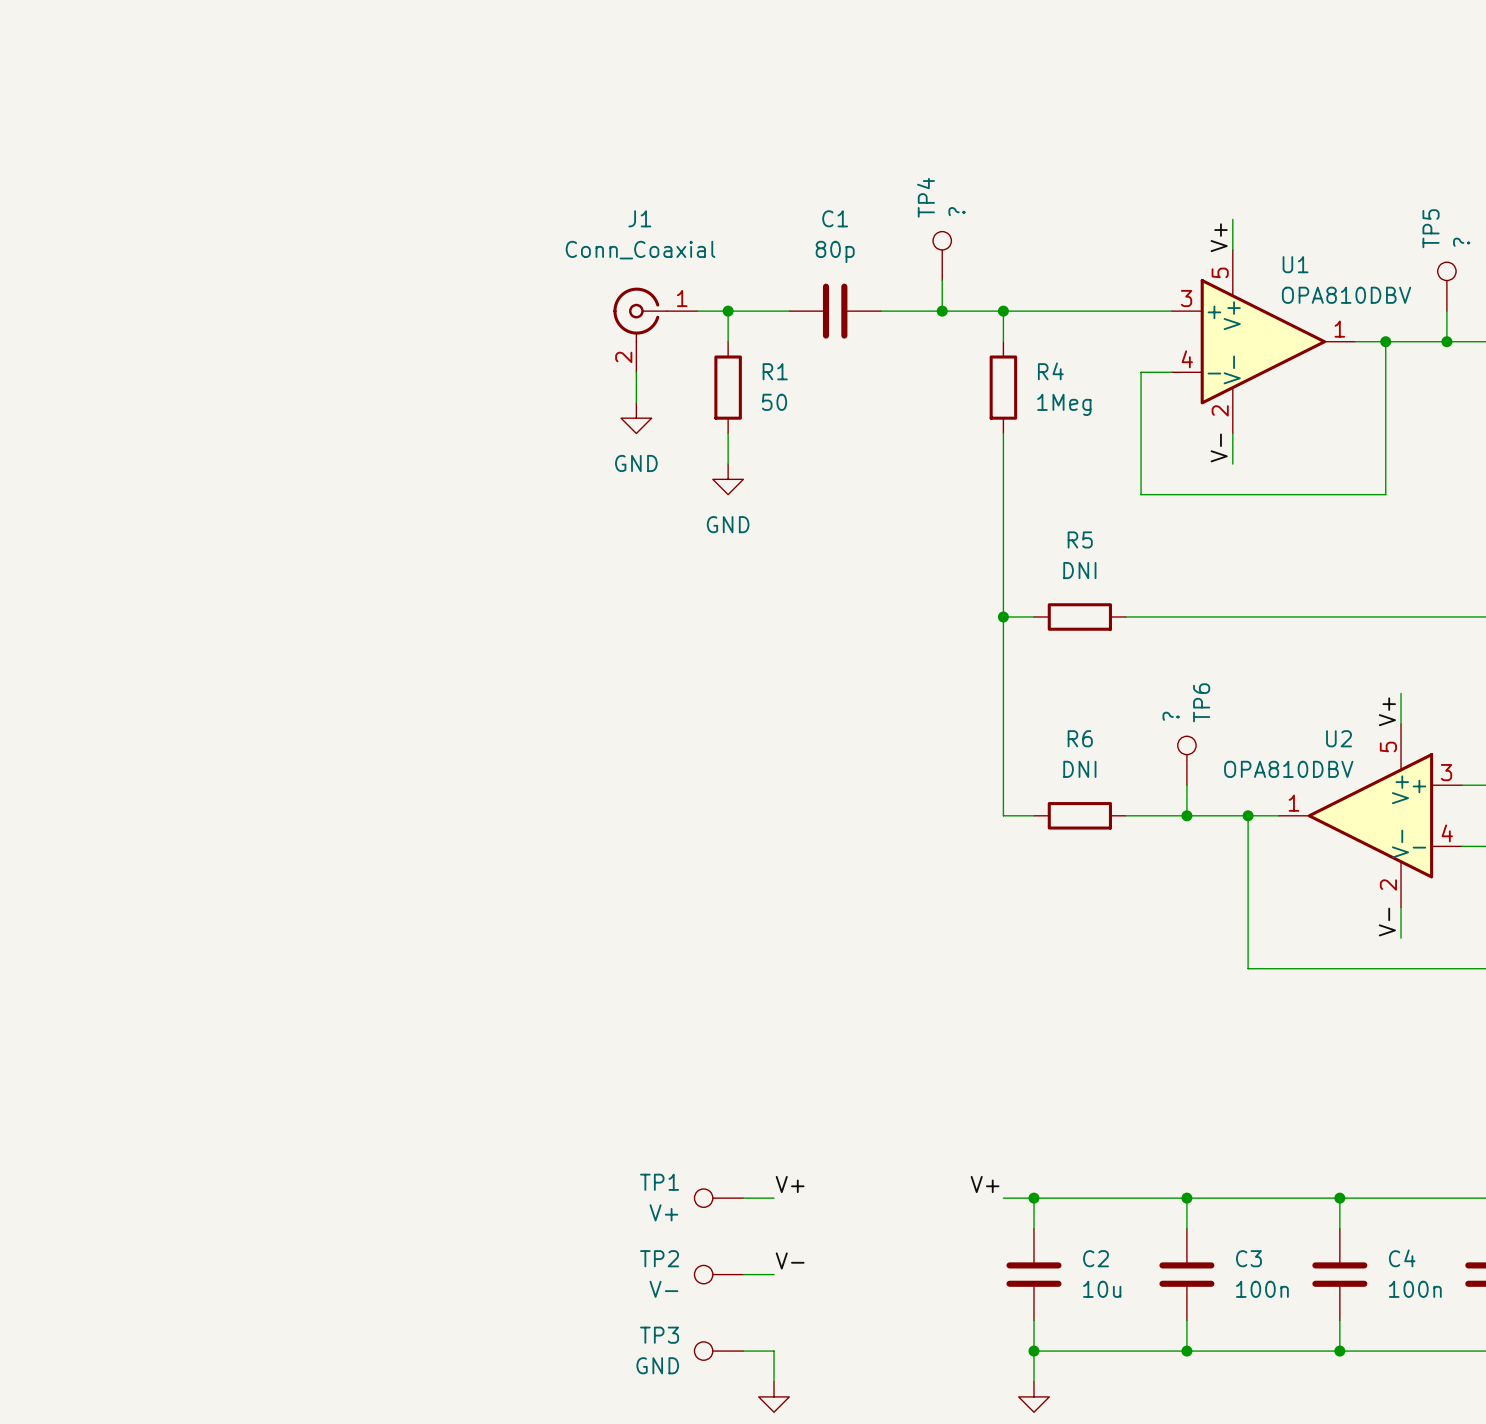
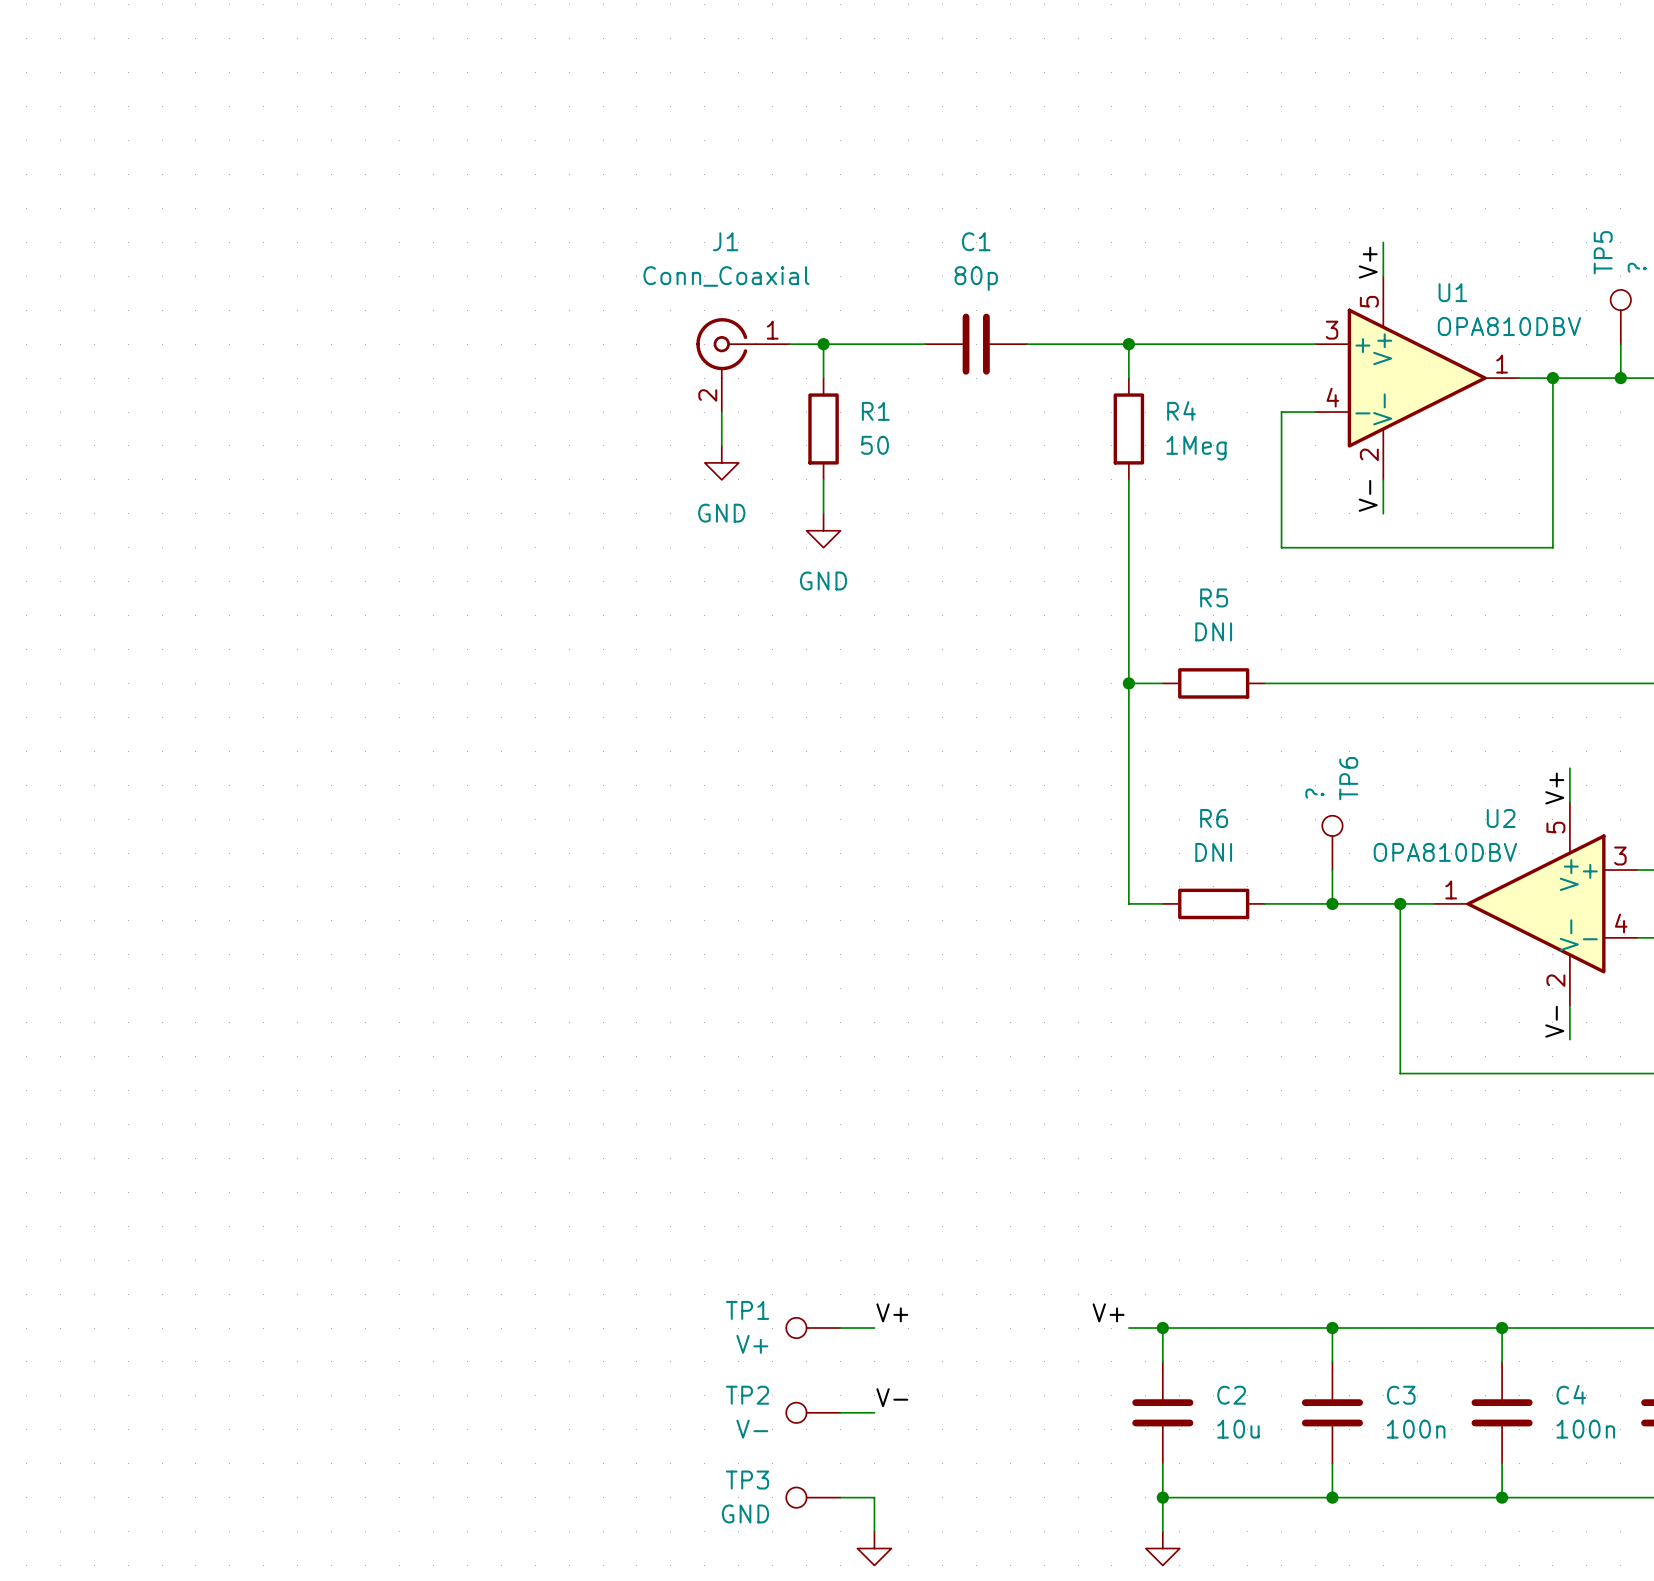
TP4: ? (942, 256) -> none
wire: (942, 280) (942, 311) -> none
C1 position: (835, 311) -> (976, 344)
junction: (942, 311) -> none

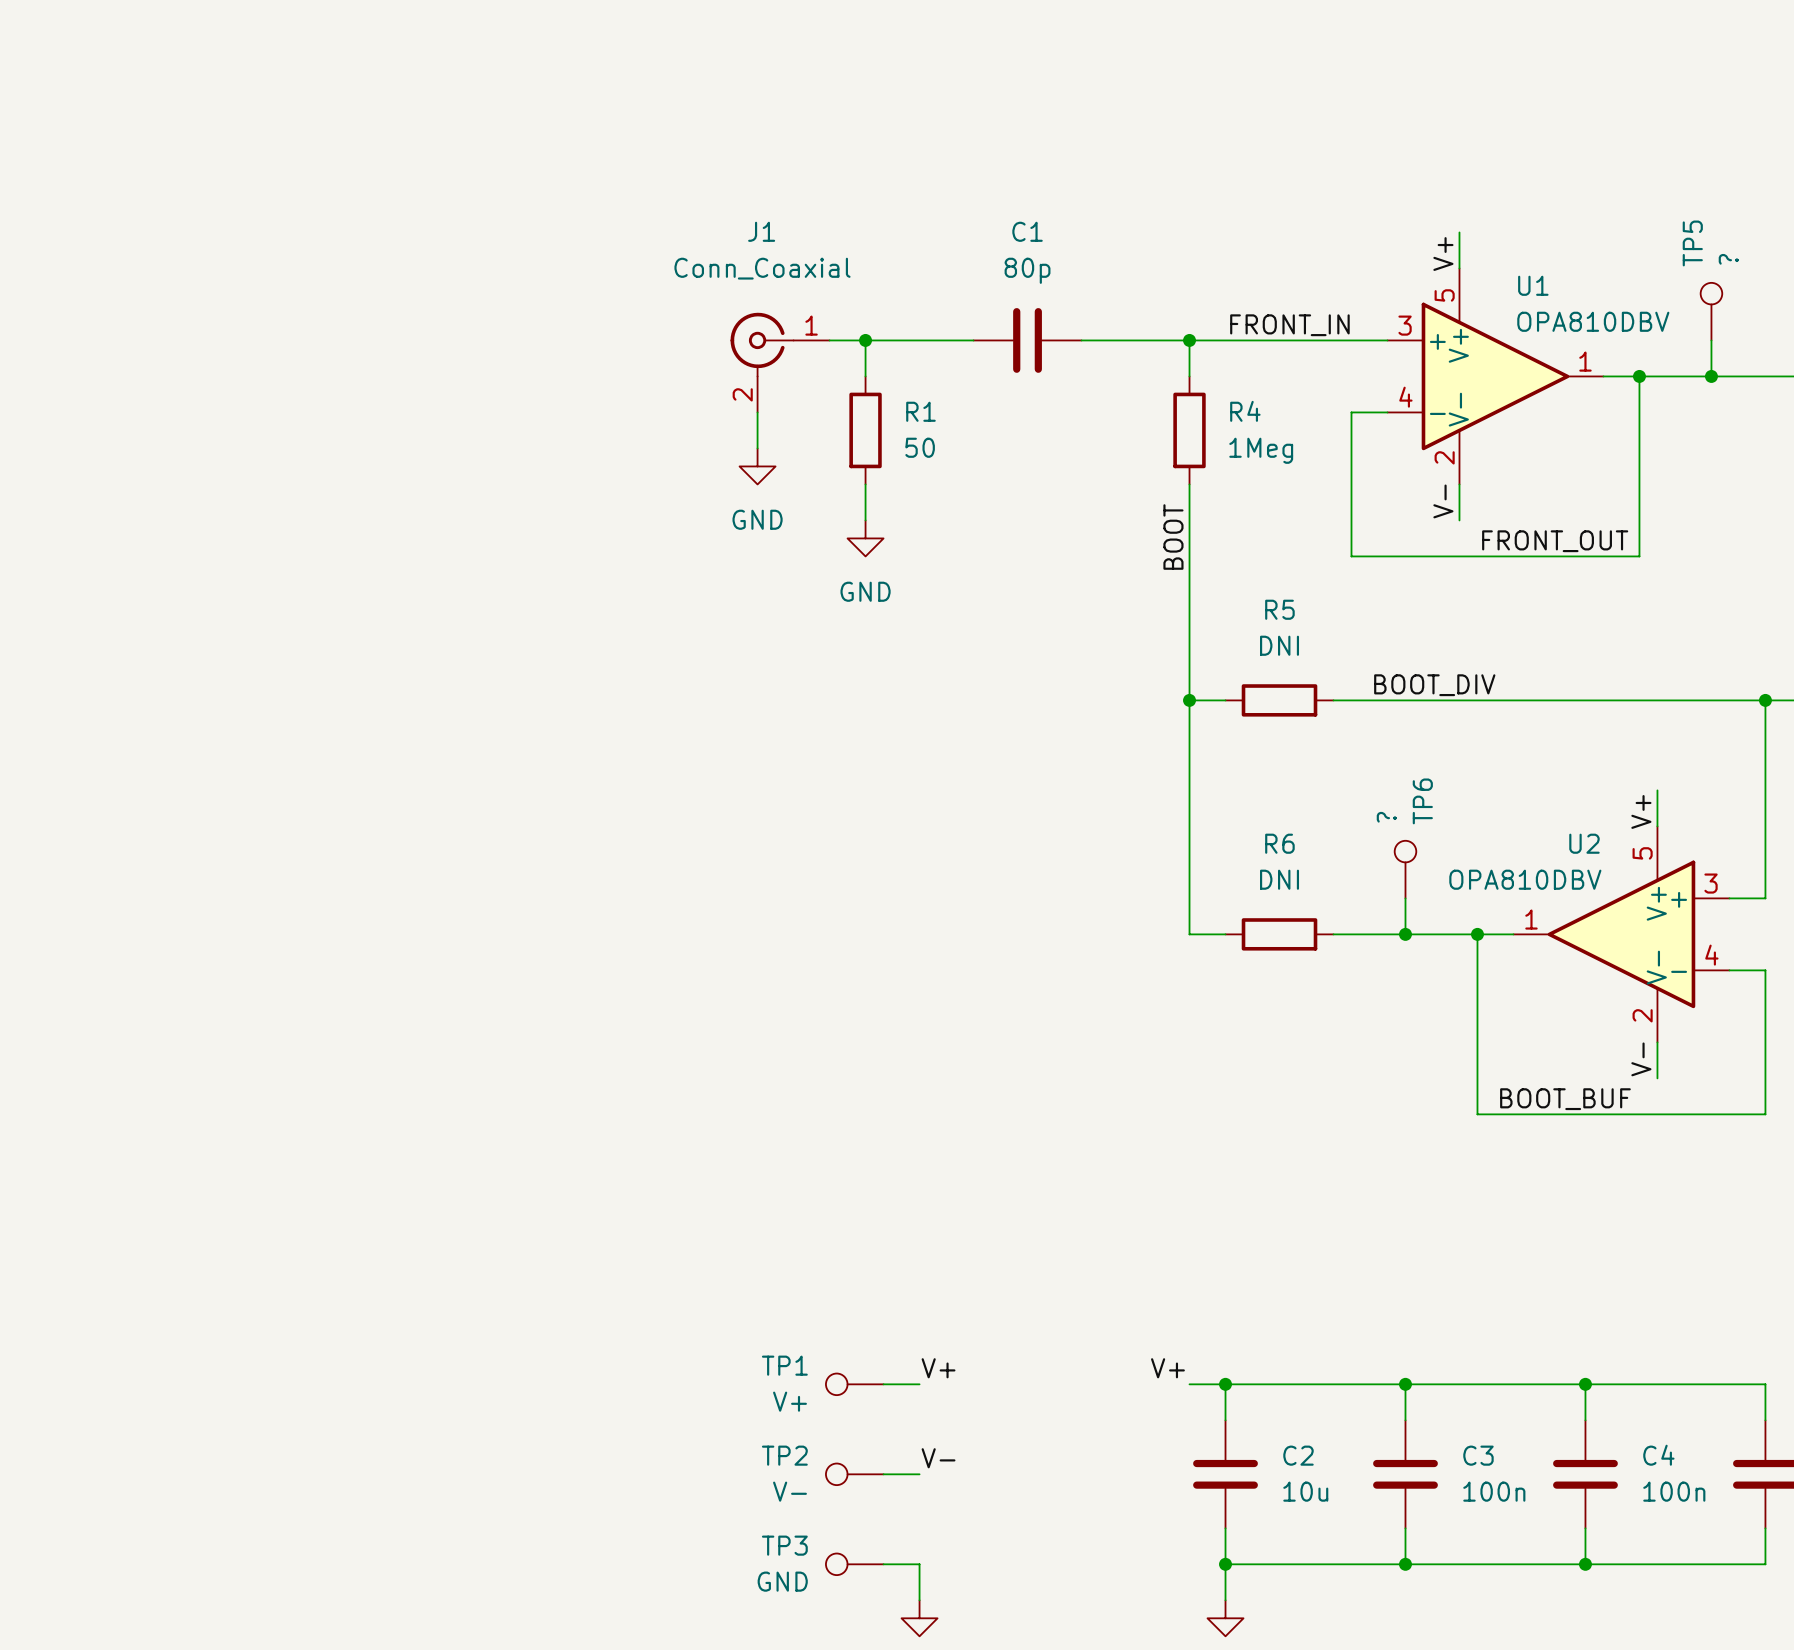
label: none -> FRONT_IN (1289, 325)
label: none -> BOOT (1173, 537)
label: none -> FRONT_OUT (1555, 541)
label: none -> BOOT_DIV (1434, 685)
label: none -> BOOT_BUF (1565, 1099)

